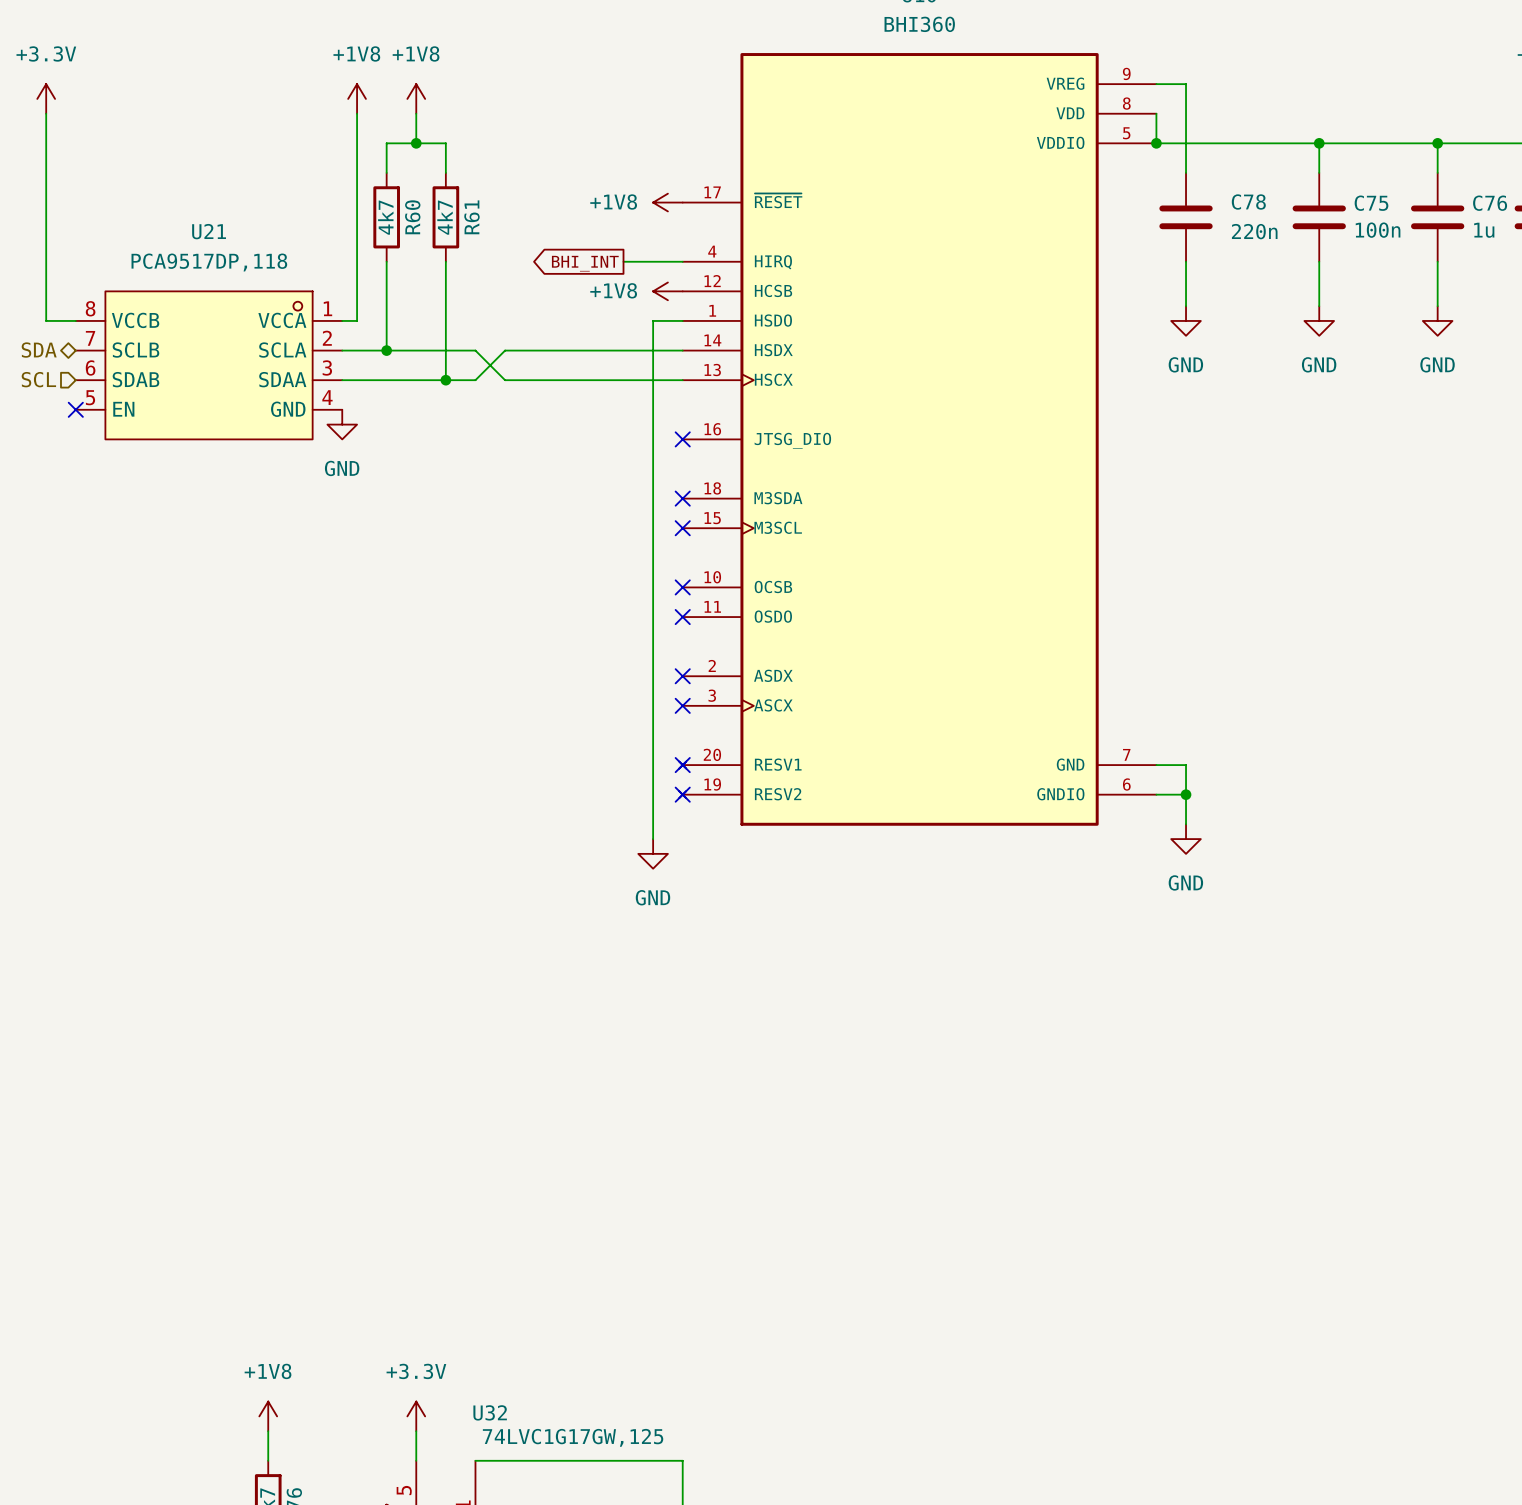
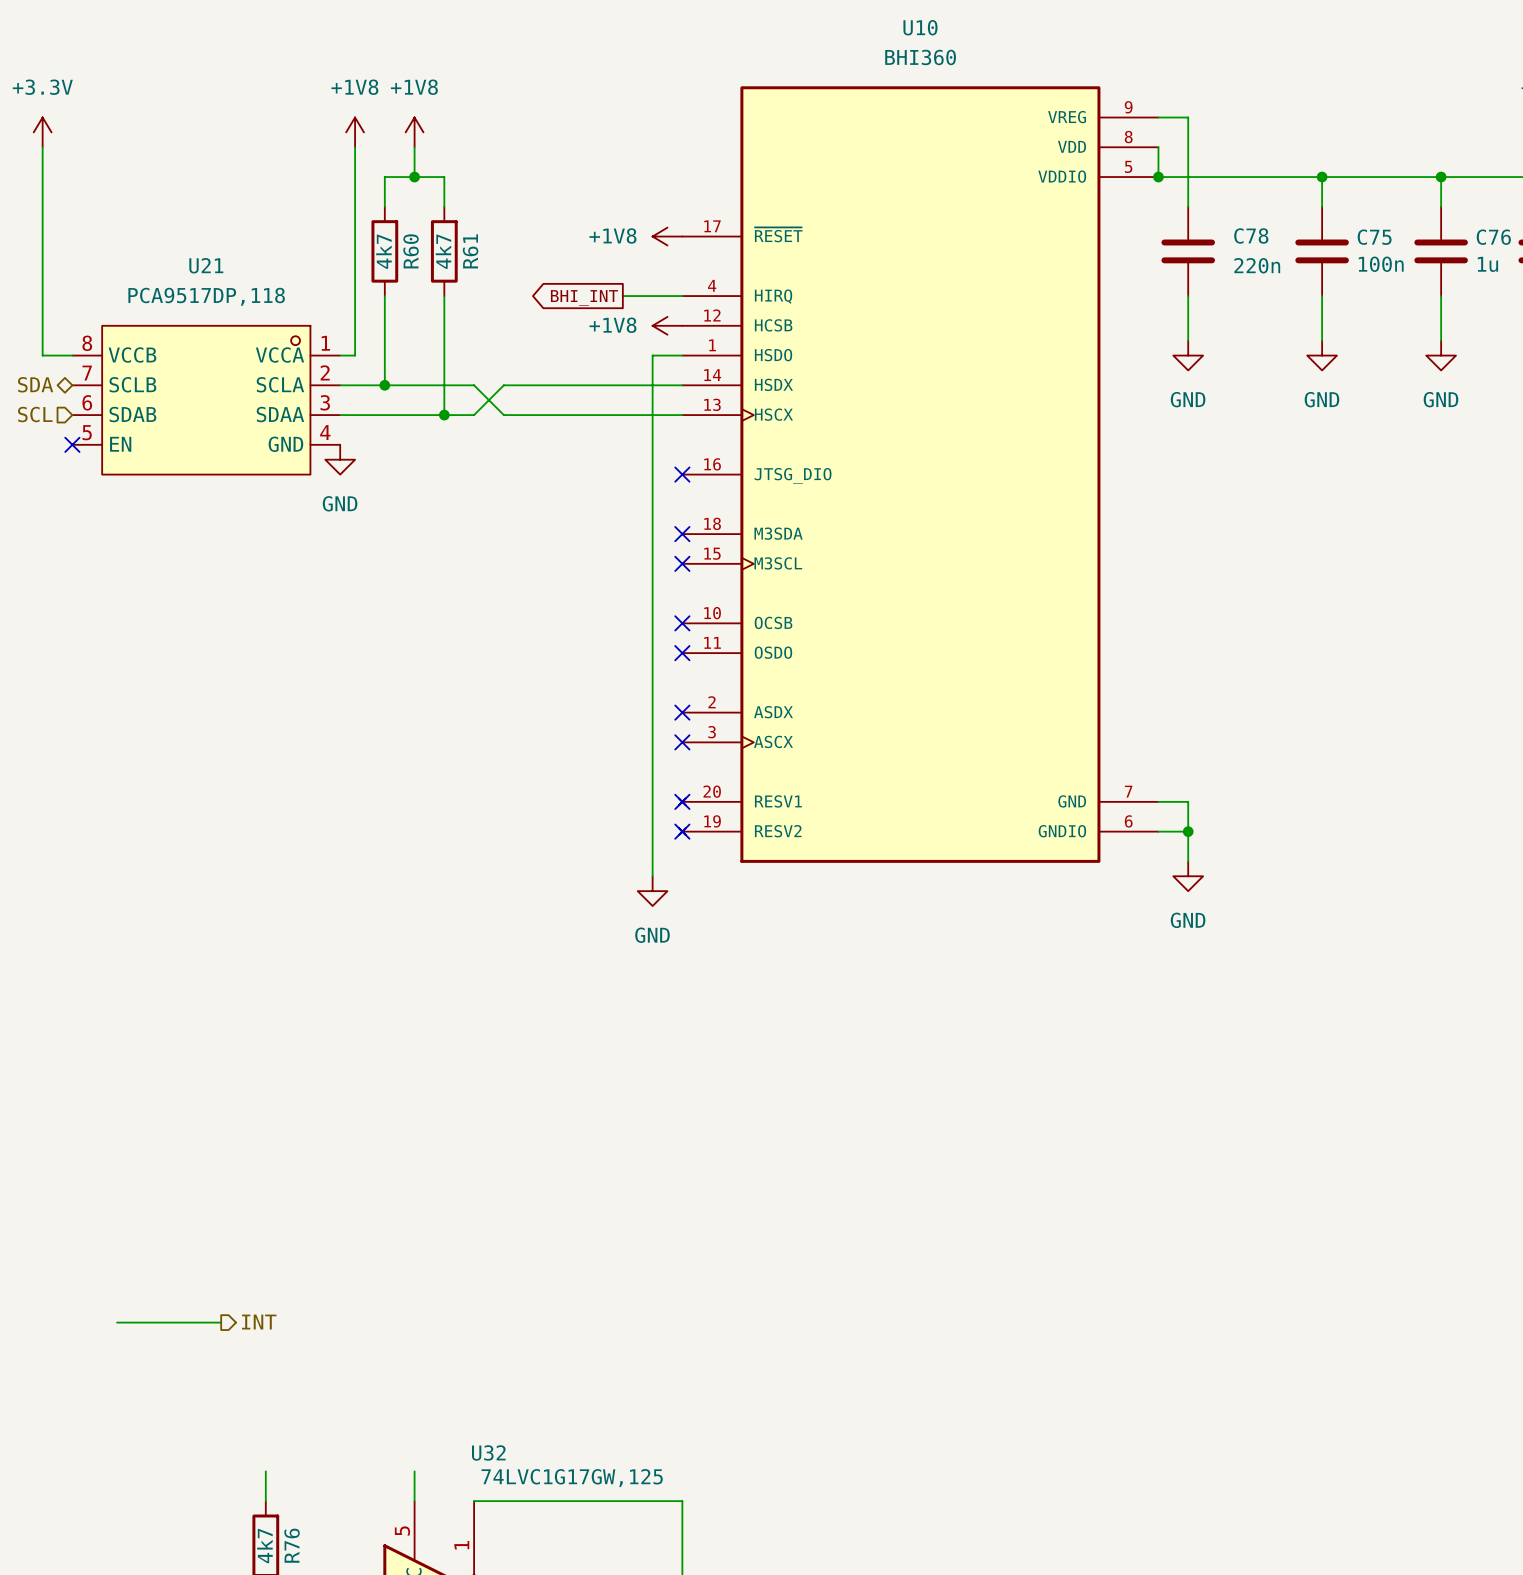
hierarchical label: none -> INT (259, 1322)
wire: none -> (117, 1322) (221, 1322)
power symbol: +1V8 (268, 1416) -> none
power symbol: +3.3V (416, 1416) -> none

